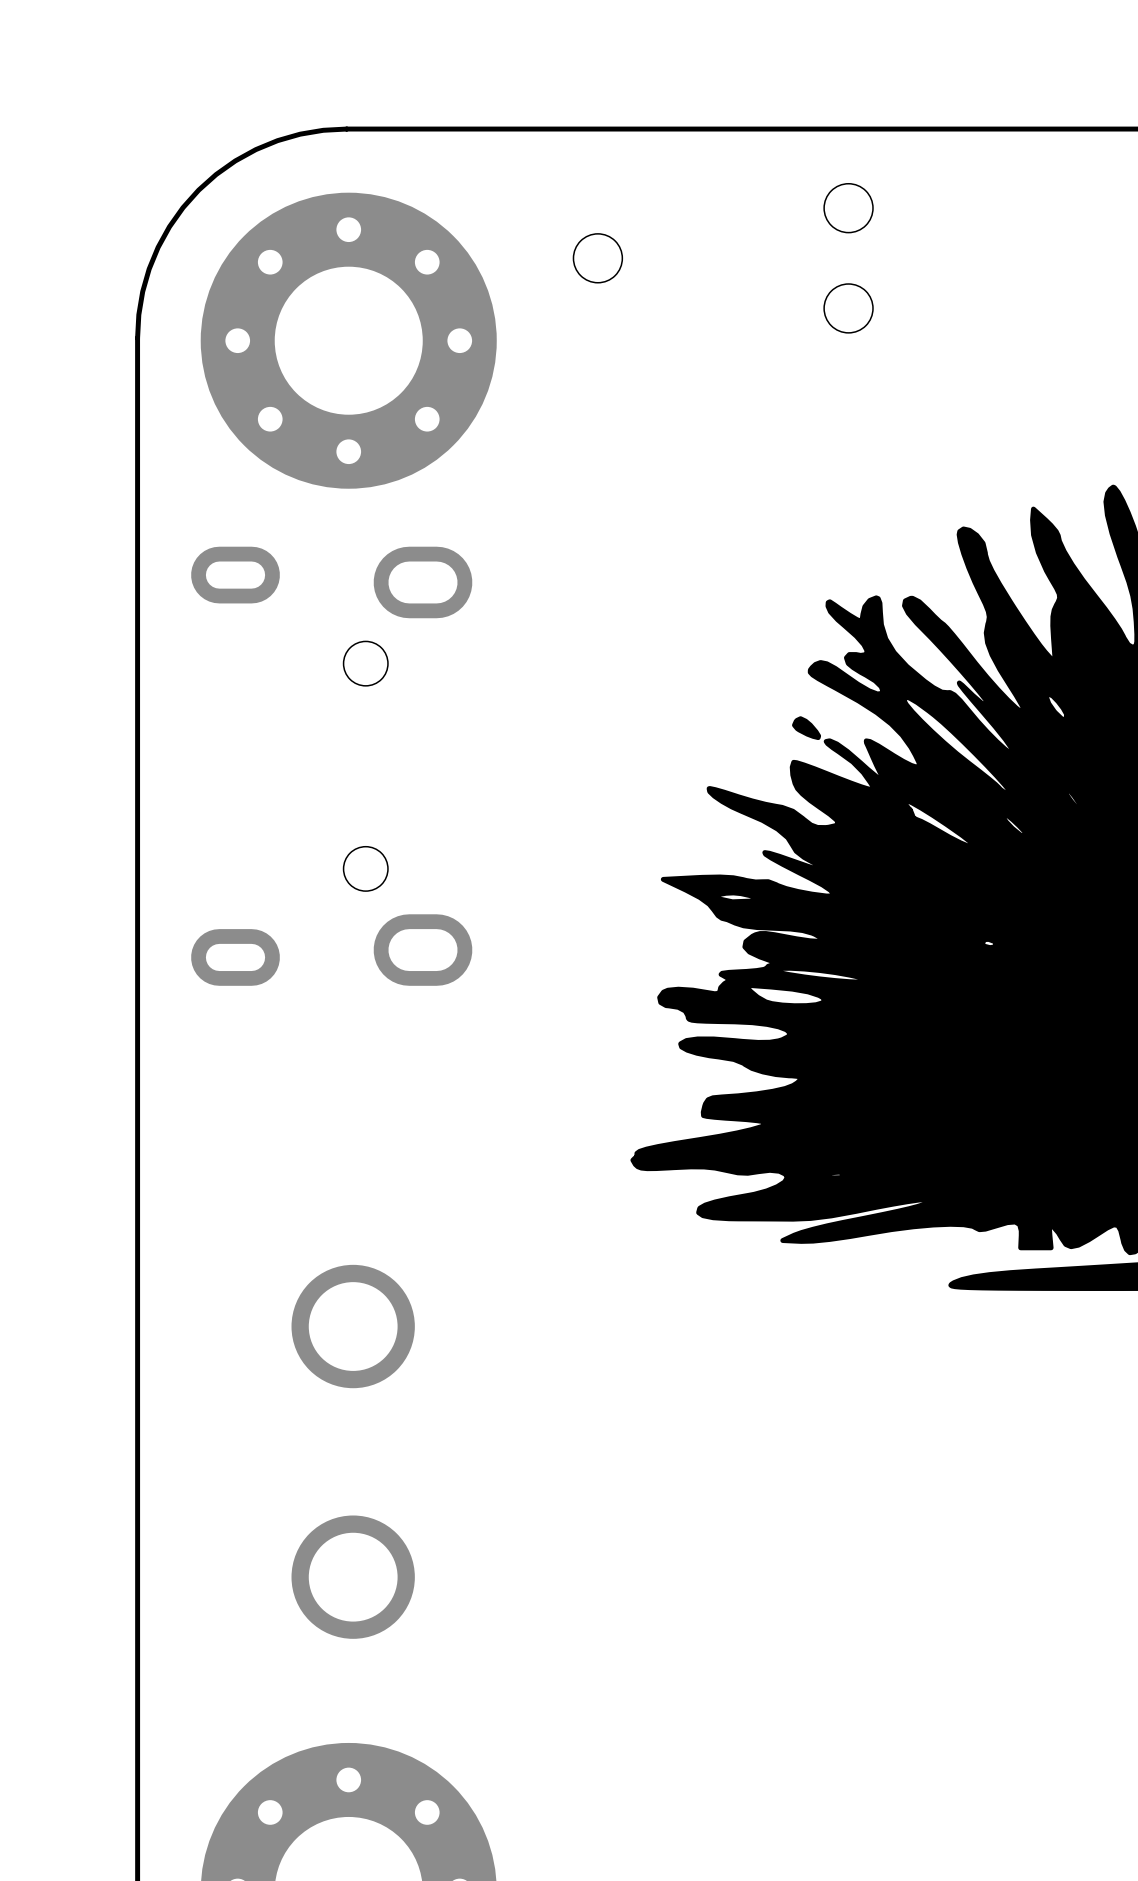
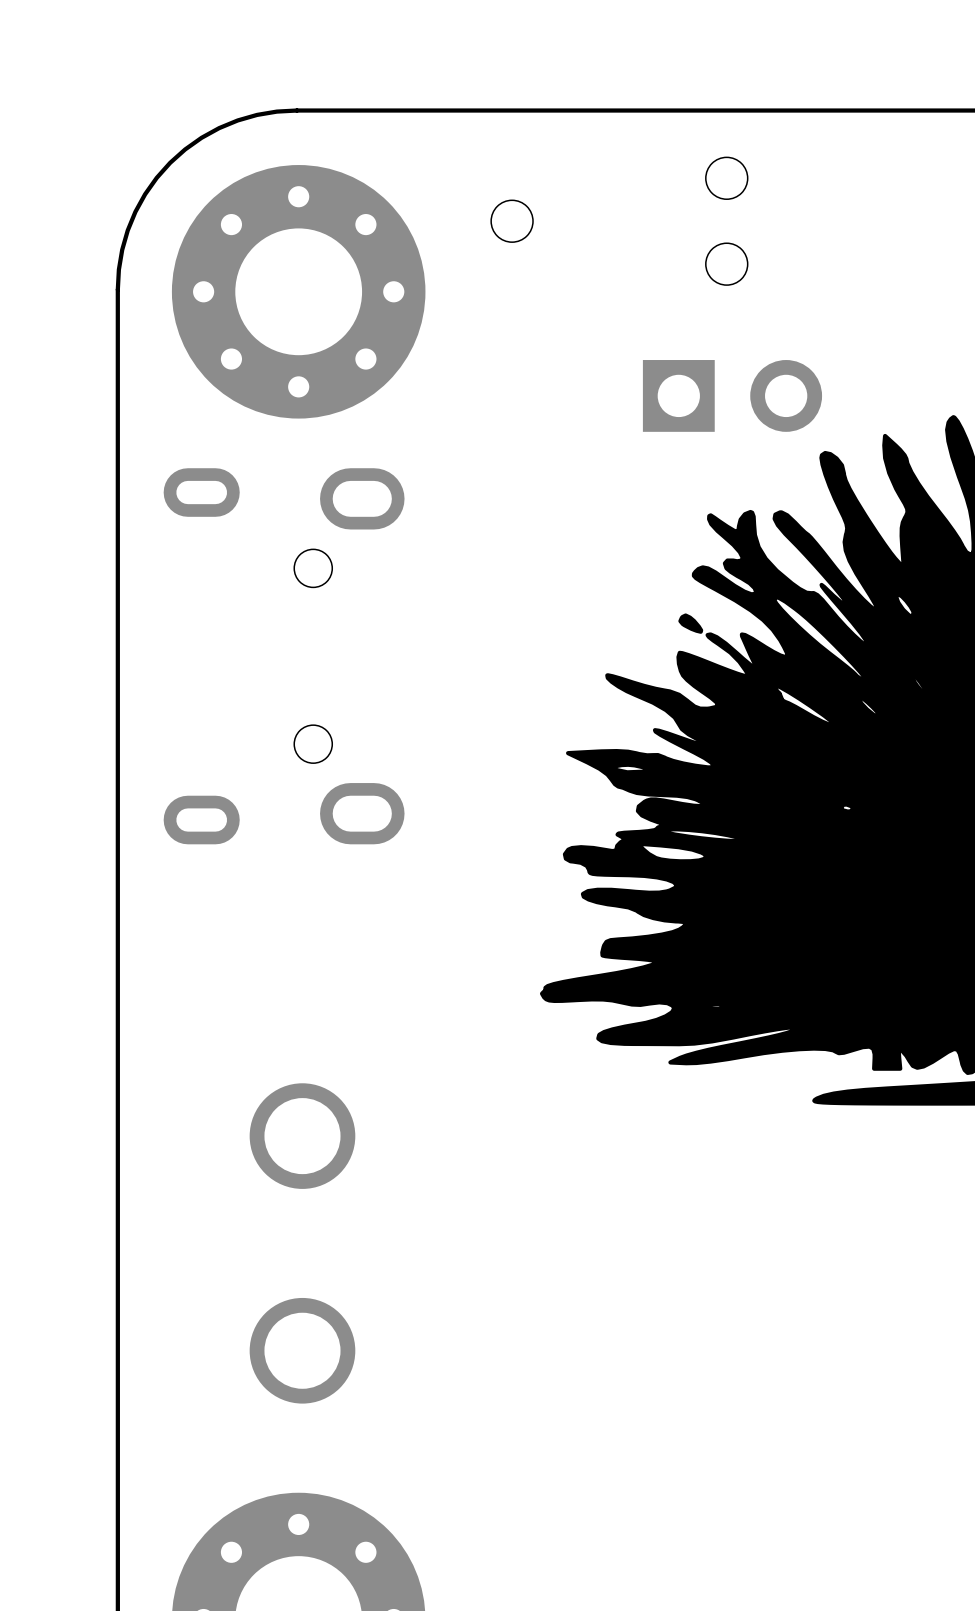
part: none -> (732, 395)

